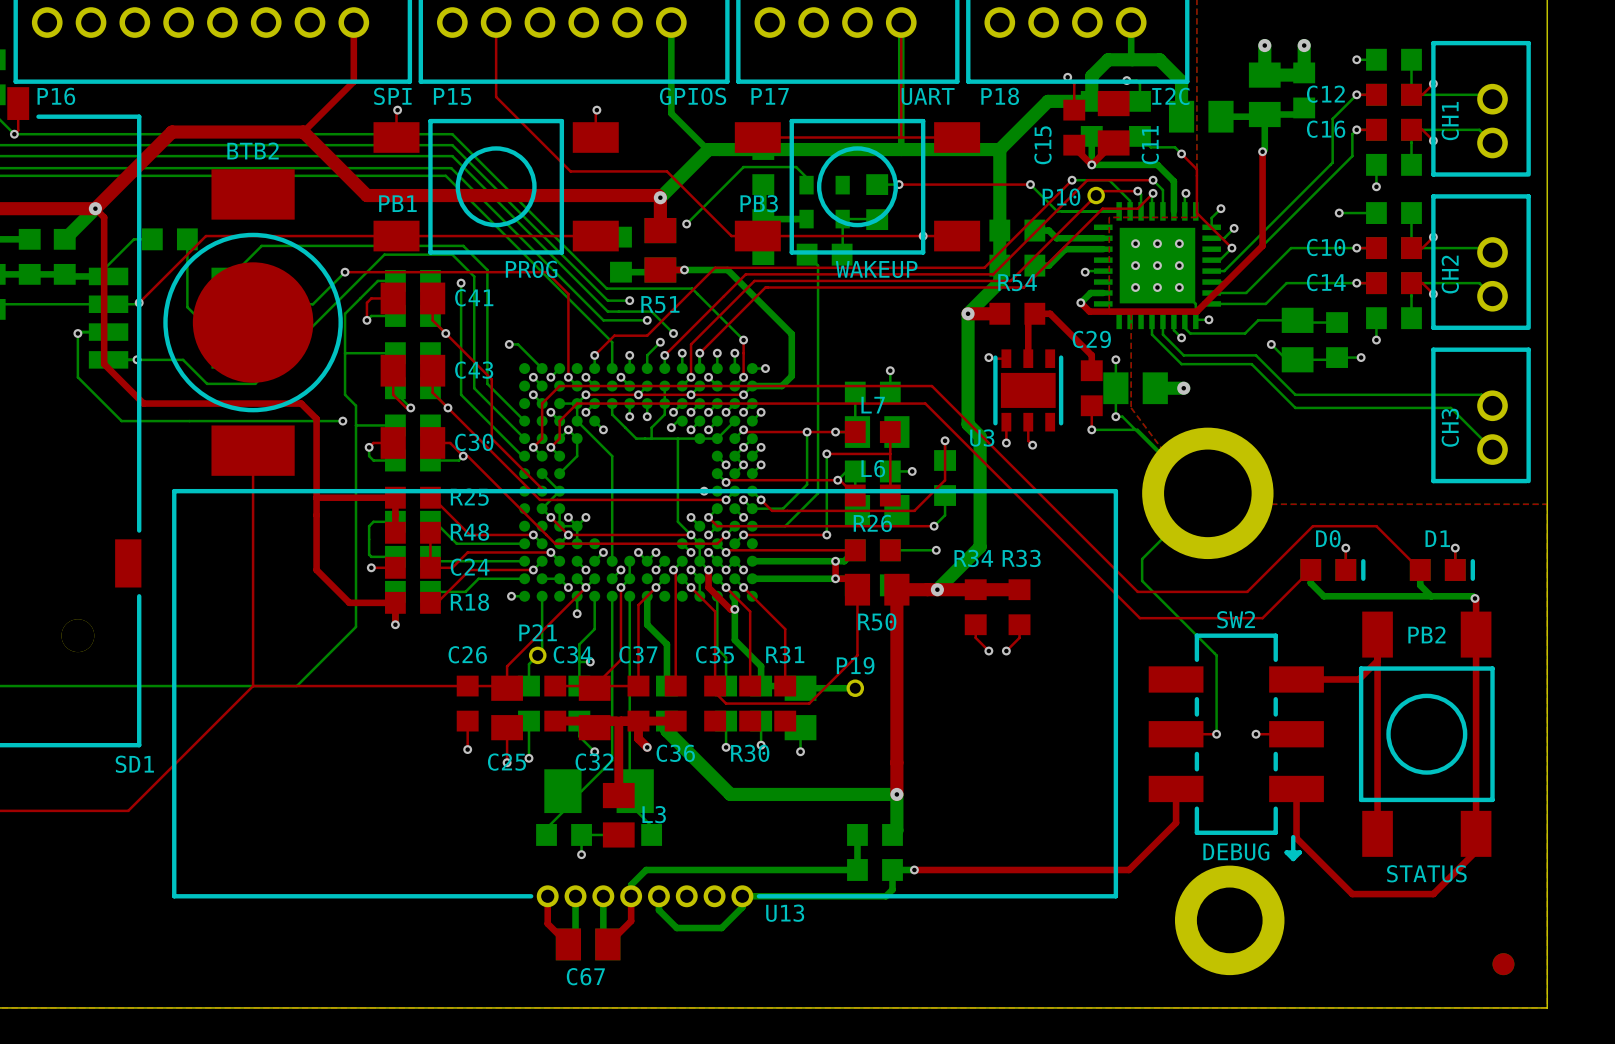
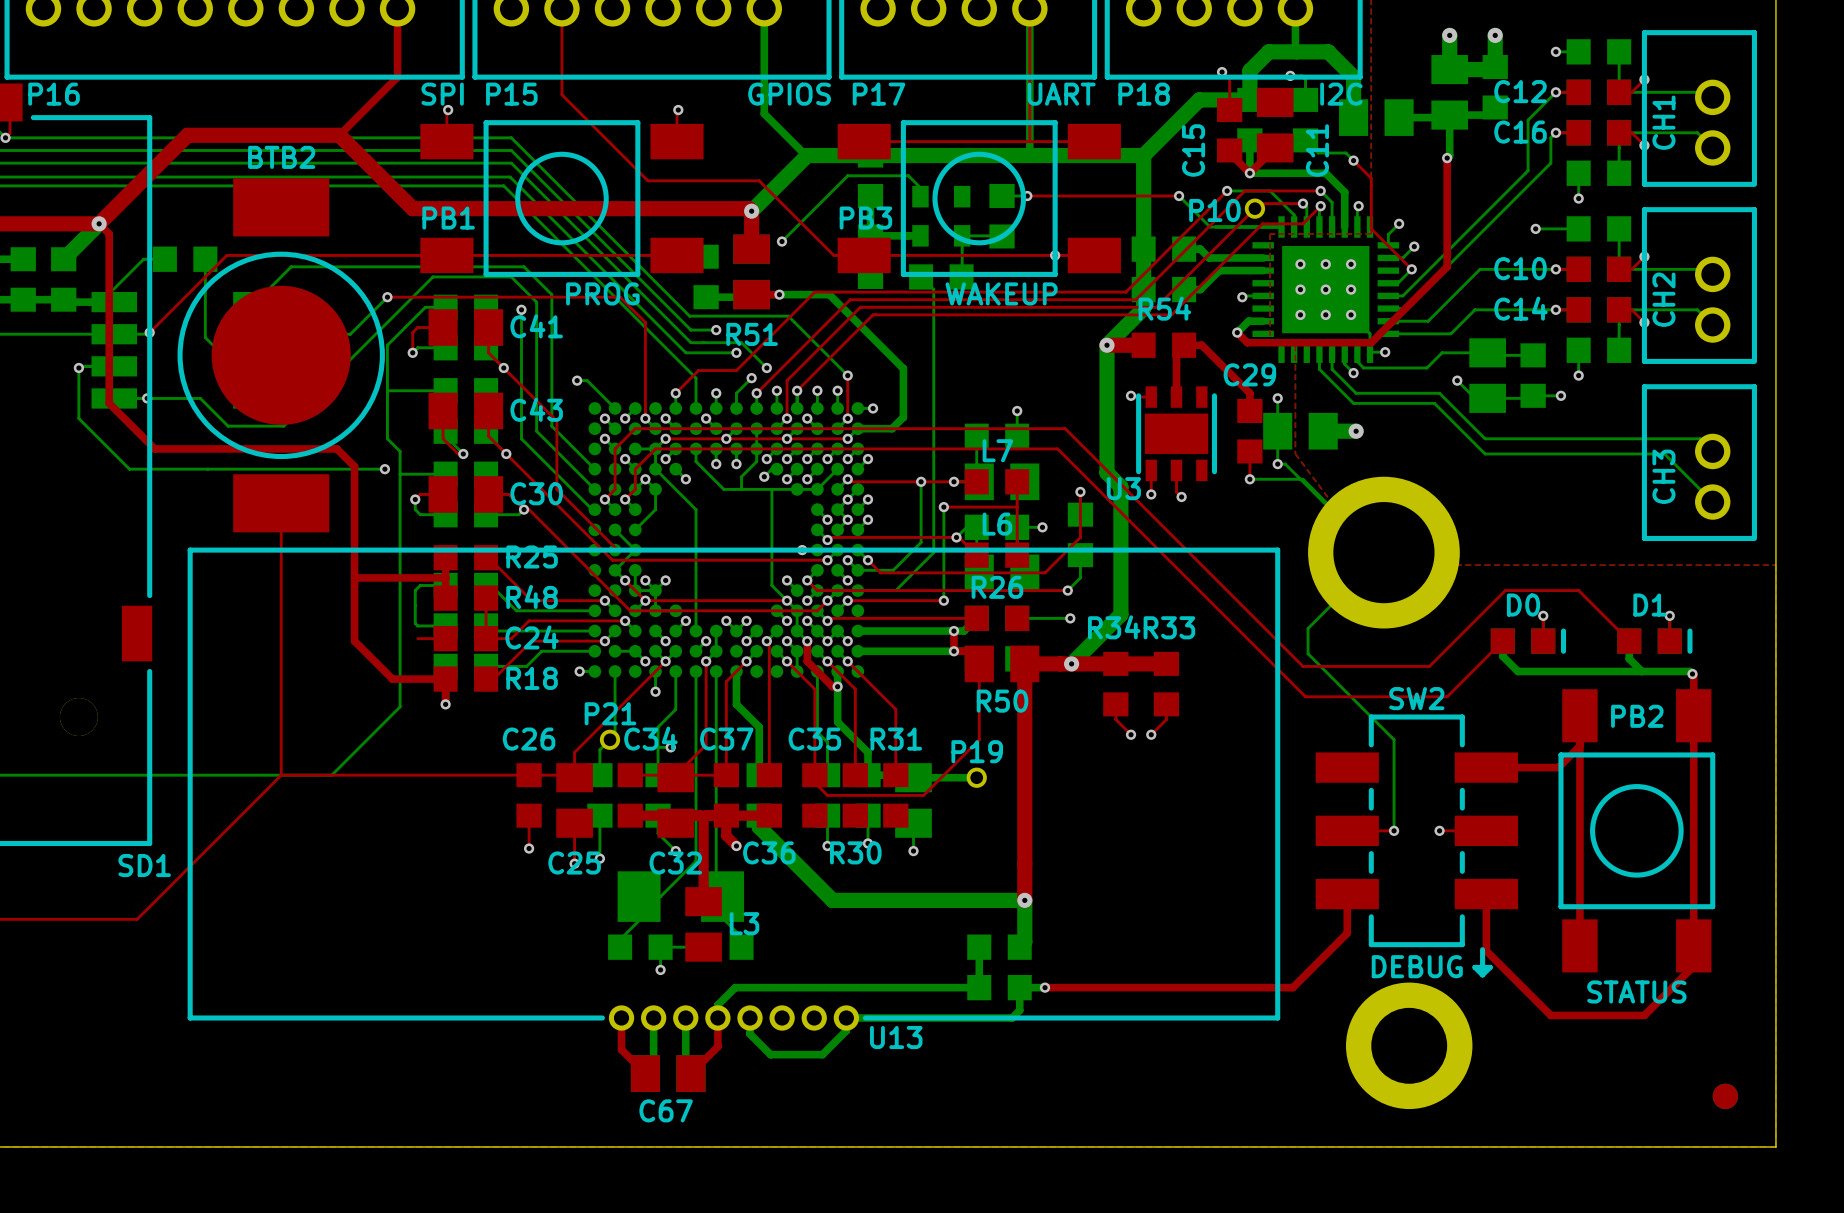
top track: (316, 497) (395, 497) -> (354, 577) (445, 577)
via: (371, 567) -> none

